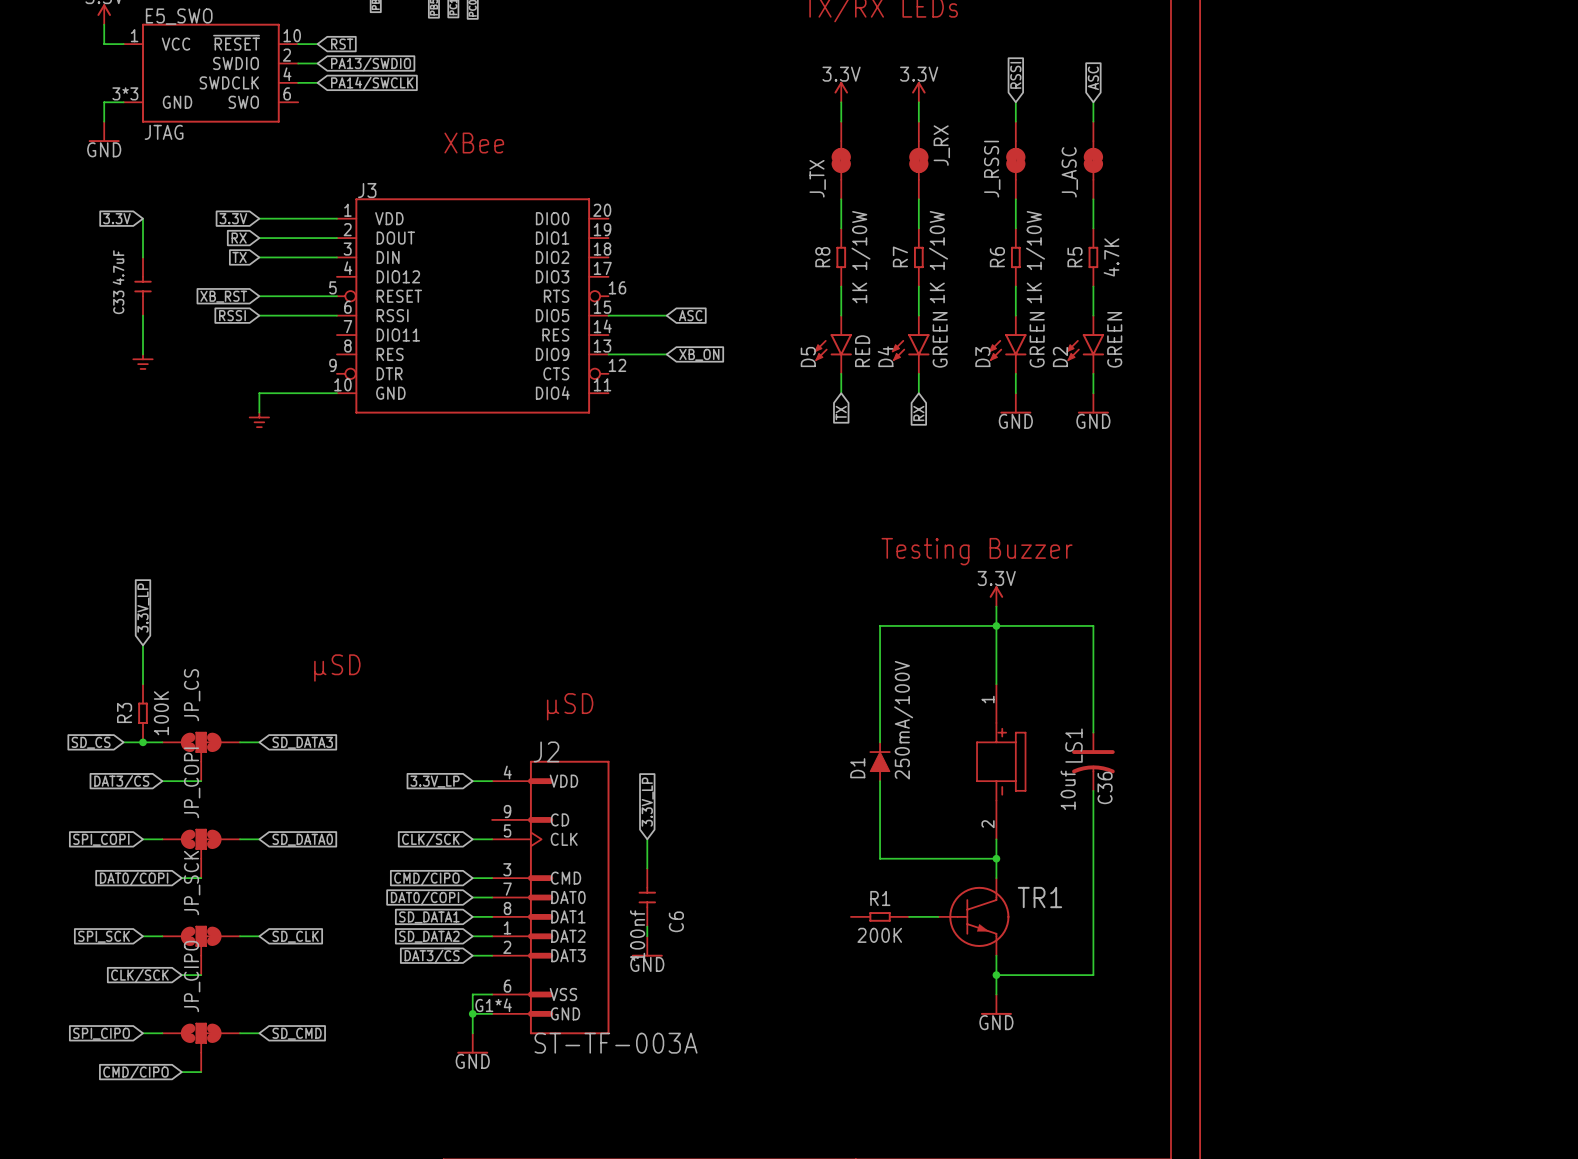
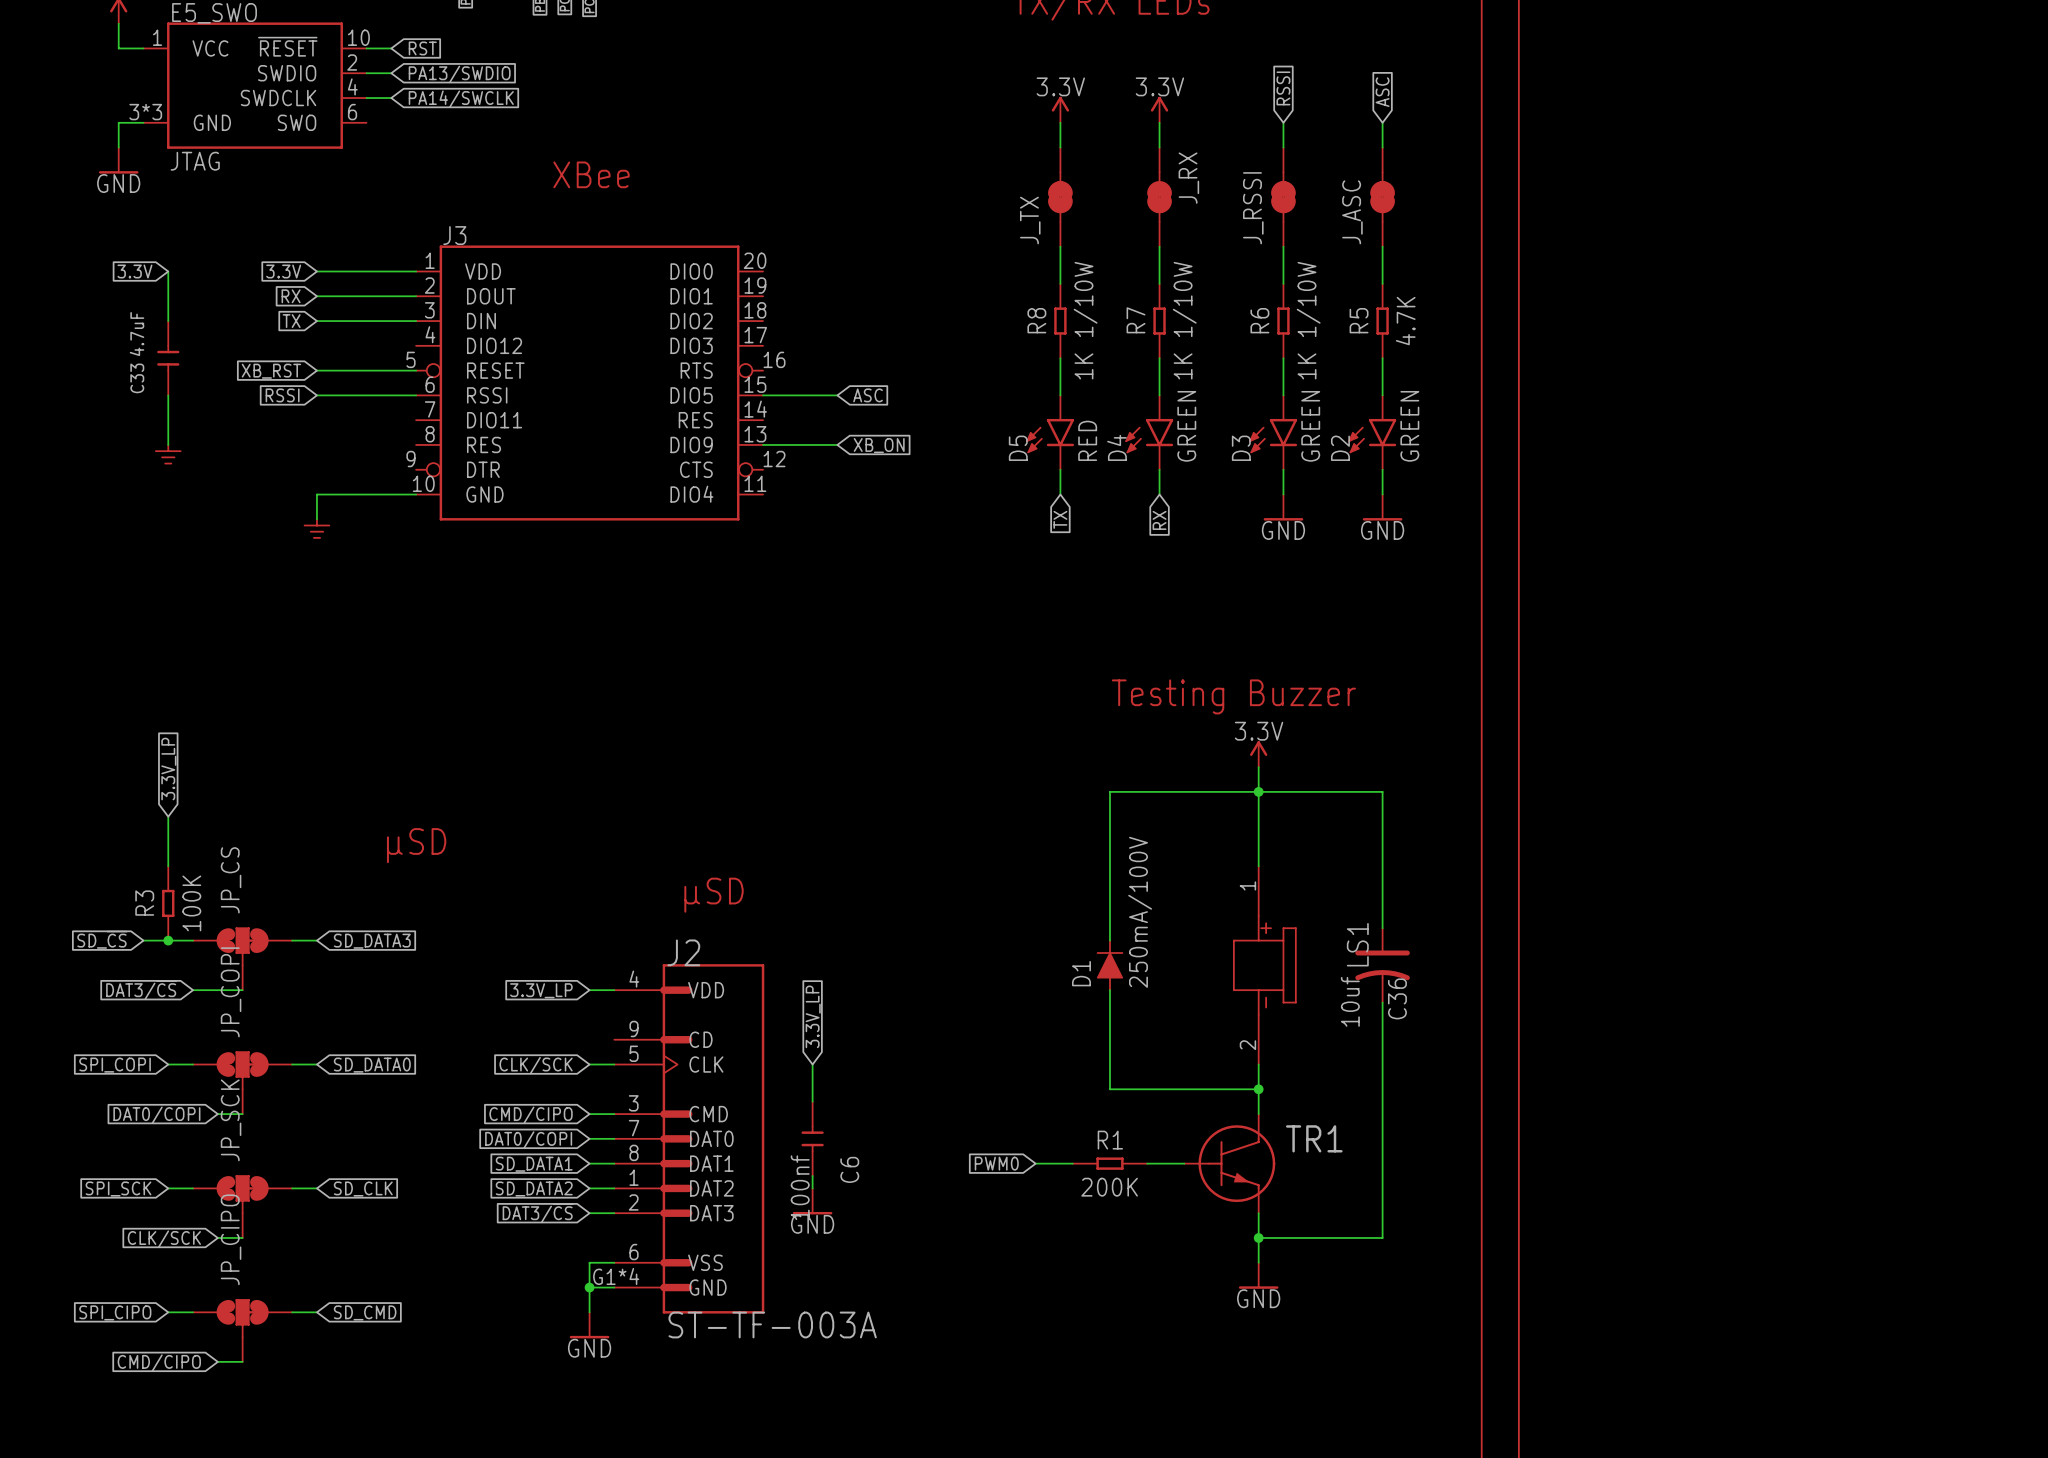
global label: none -> PWM0 (996, 1163)
wire: none -> (1035, 1163) (1072, 1163)

